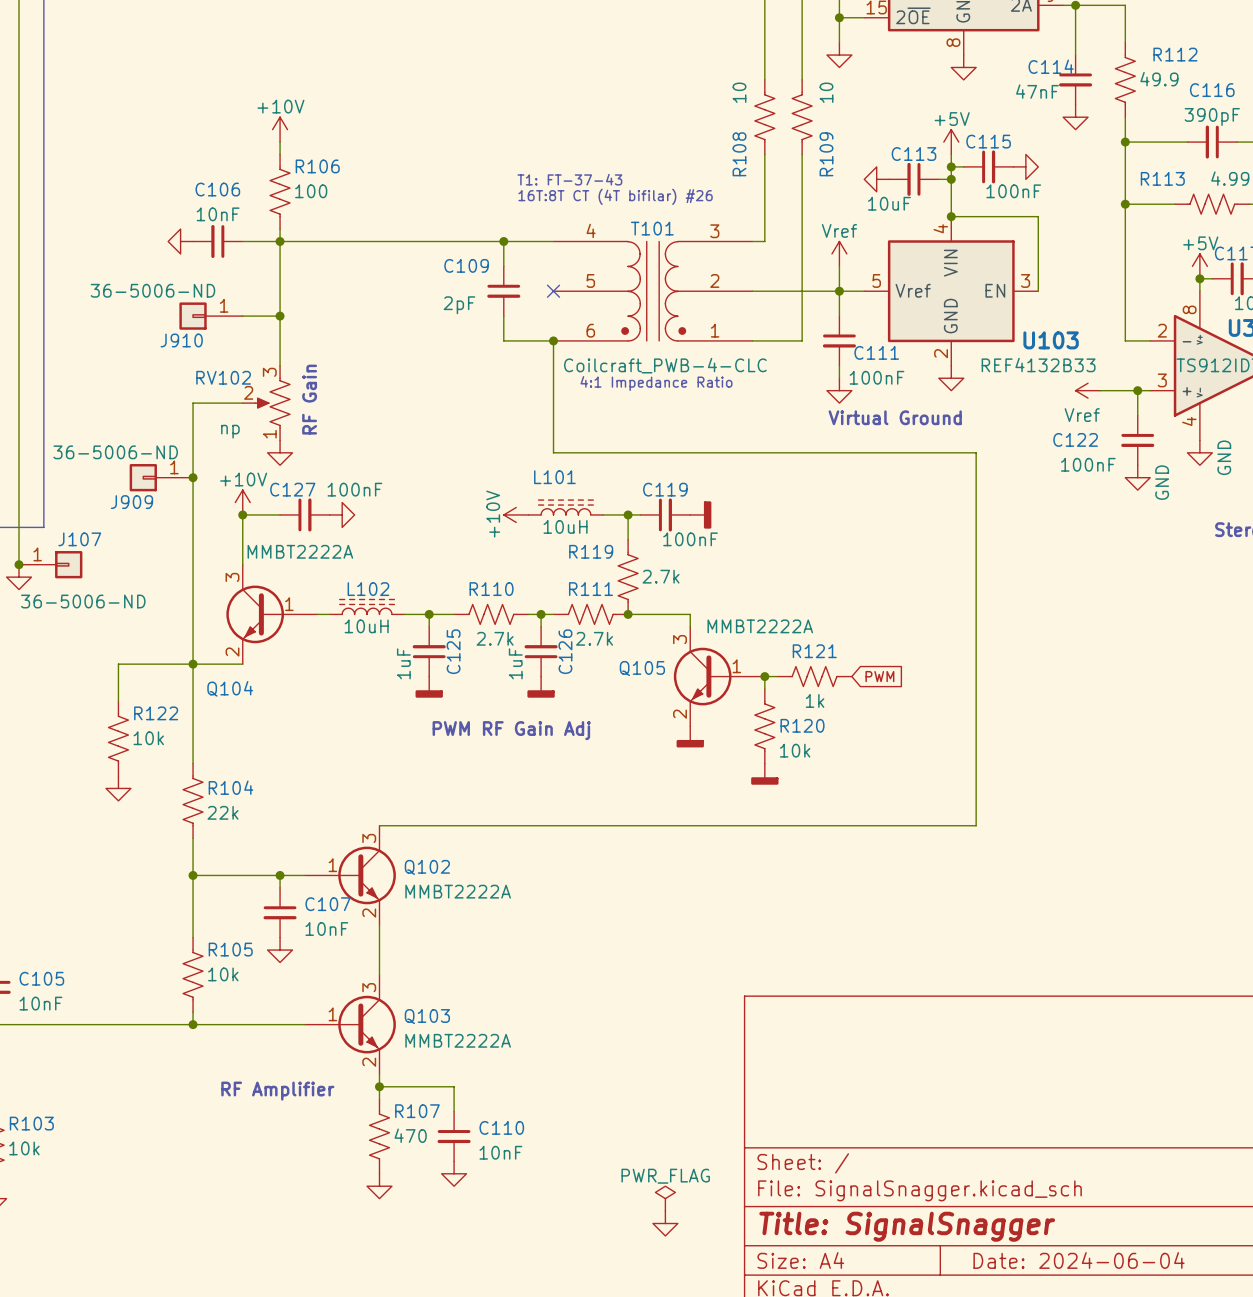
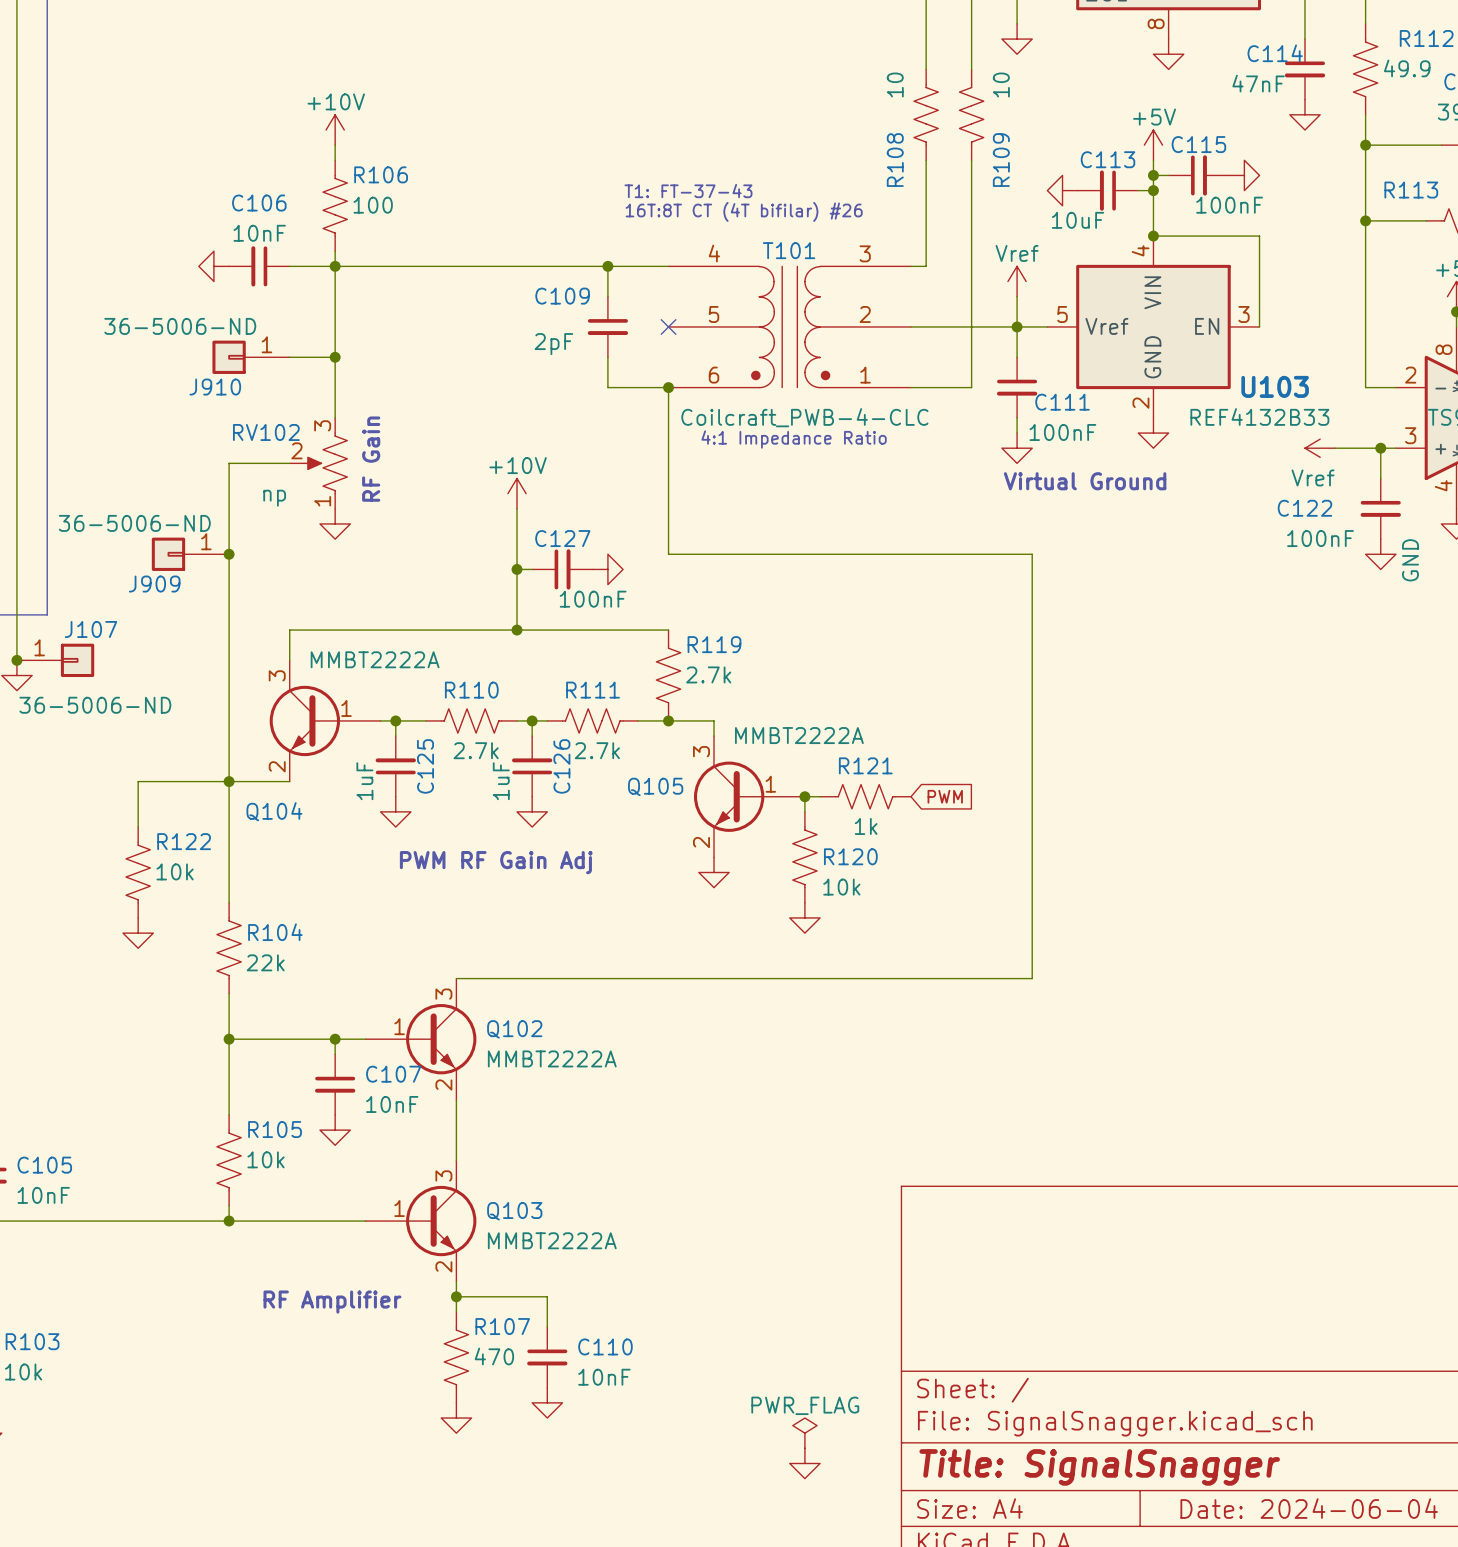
power symbol: none -> +10V (517, 493)
wire: none -> (517, 508) (517, 630)
wire: (553, 452) (976, 452) (976, 825) (851, 825) -> (668, 523) (668, 554) (1032, 554) (1032, 978)
C127 name position: C127 (292, 489) -> C127 (562, 538)
C127 value position: 100nF (354, 489) -> 100nF (593, 599)
wire: none -> (517, 569) (532, 569)
junction: none -> (517, 569)
power symbol: none -> (607, 569)
power symbol: +10V (242, 502) -> none
L101: 10uH (565, 507) -> none
junction: (242, 514) -> none
wire: (280, 514) (242, 514) (242, 539) -> (668, 630) (289, 630)
C127 position: (304, 514) -> (562, 569)
power symbol: (342, 514) -> none
power symbol: +10V (516, 514) -> none
wire: (603, 514) (640, 514) -> none
wire: (628, 514) (628, 539) -> none
junction: (628, 514) -> none
C119: 100nF (665, 514) -> none
power symbol: (700, 514) -> none
junction: none -> (517, 630)
Q104 value position: MMBT2222A (300, 551) -> MMBT2222A (375, 659)
R119 position: (628, 577) -> (668, 675)
R110 name: R110 (491, 589) -> R111 (593, 690)
L102: 10uH (367, 606) -> none
junction: none -> (395, 720)
wire: none -> (426, 720) (395, 720) (395, 736)
R110: none -> 2.7k (471, 720)
wire: (404, 614) (429, 614) (429, 626) -> none
junction position: (429, 614) -> (532, 720)
wire: (541, 614) (541, 626) -> (532, 720) (532, 736)
junction position: (541, 614) -> (668, 720)
wire: none -> (668, 720) (714, 720) (714, 736)
R111: 2.7k (590, 614) -> none
wire: (628, 614) (690, 614) (690, 626) -> none
junction: (628, 614) -> none
C125 position: (429, 651) -> (395, 766)
C126 position: (541, 651) -> (532, 766)
junction: none -> (804, 796)
Q105 position: (719, 676) -> (749, 796)
junction: (764, 676) -> none
wire: (777, 676) (764, 676) (764, 689) -> (820, 796) (804, 796) (804, 811)
R121 position: (814, 676) -> (865, 796)
global label position: PWM (879, 676) -> PWM (945, 796)
power symbol: (429, 687) -> none
power symbol: (541, 687) -> none
power symbol: none -> (395, 811)
power symbol: none -> (532, 811)
R120 position: (764, 726) -> (804, 857)
text position: PWM RF Gain Adj (511, 730) -> PWM RF Gain Adj (496, 862)
power symbol: (690, 736) -> none
power symbol: none -> (714, 872)
power symbol: (764, 774) -> none
power symbol: none -> (804, 917)

